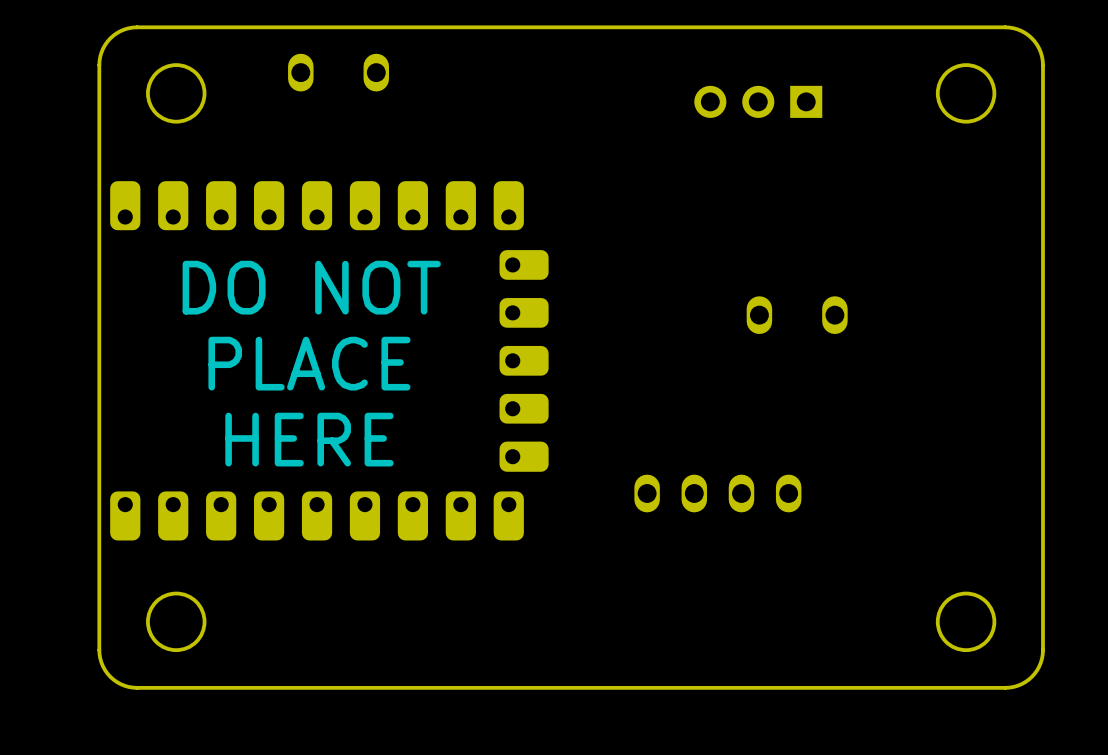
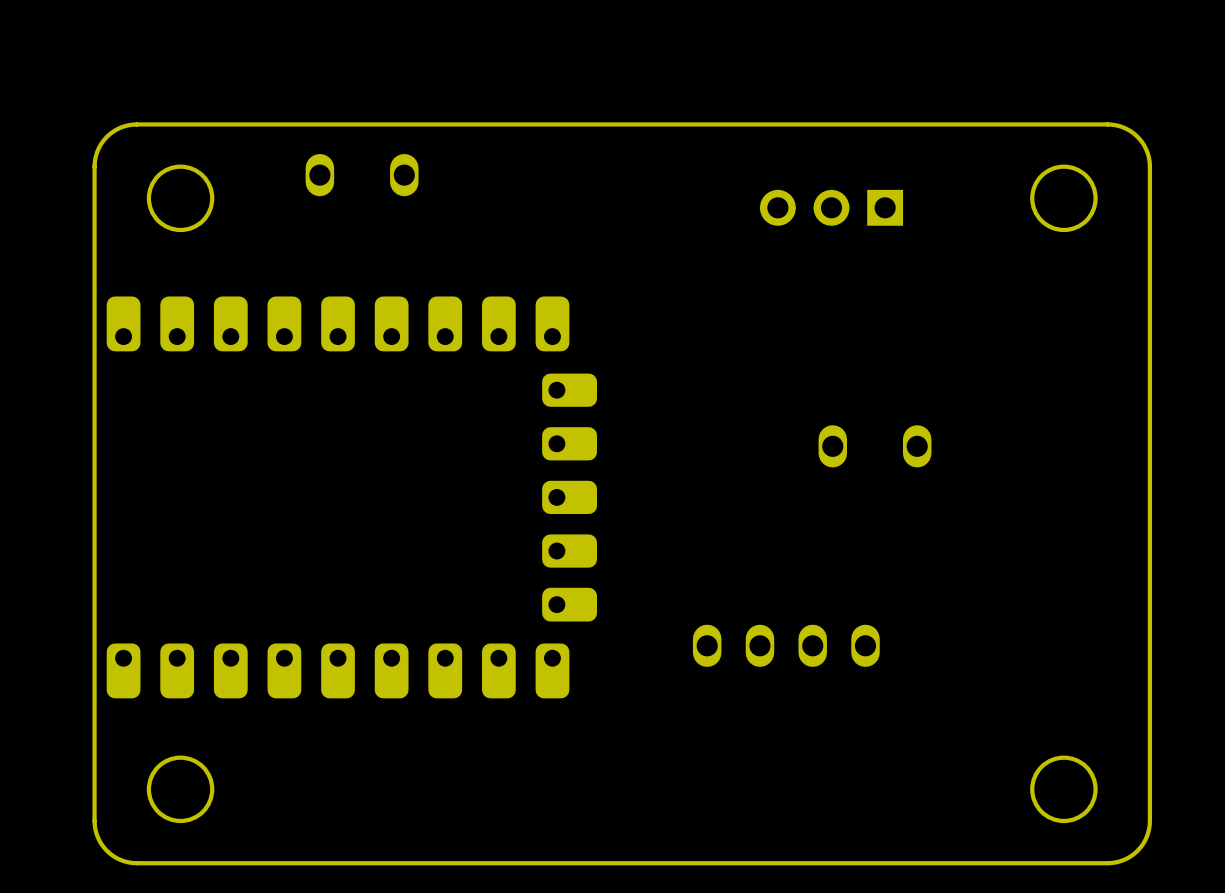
text: DO NOT (311, 287) -> none
text: PLACE (309, 363) -> none
text: HERE (309, 439) -> none

